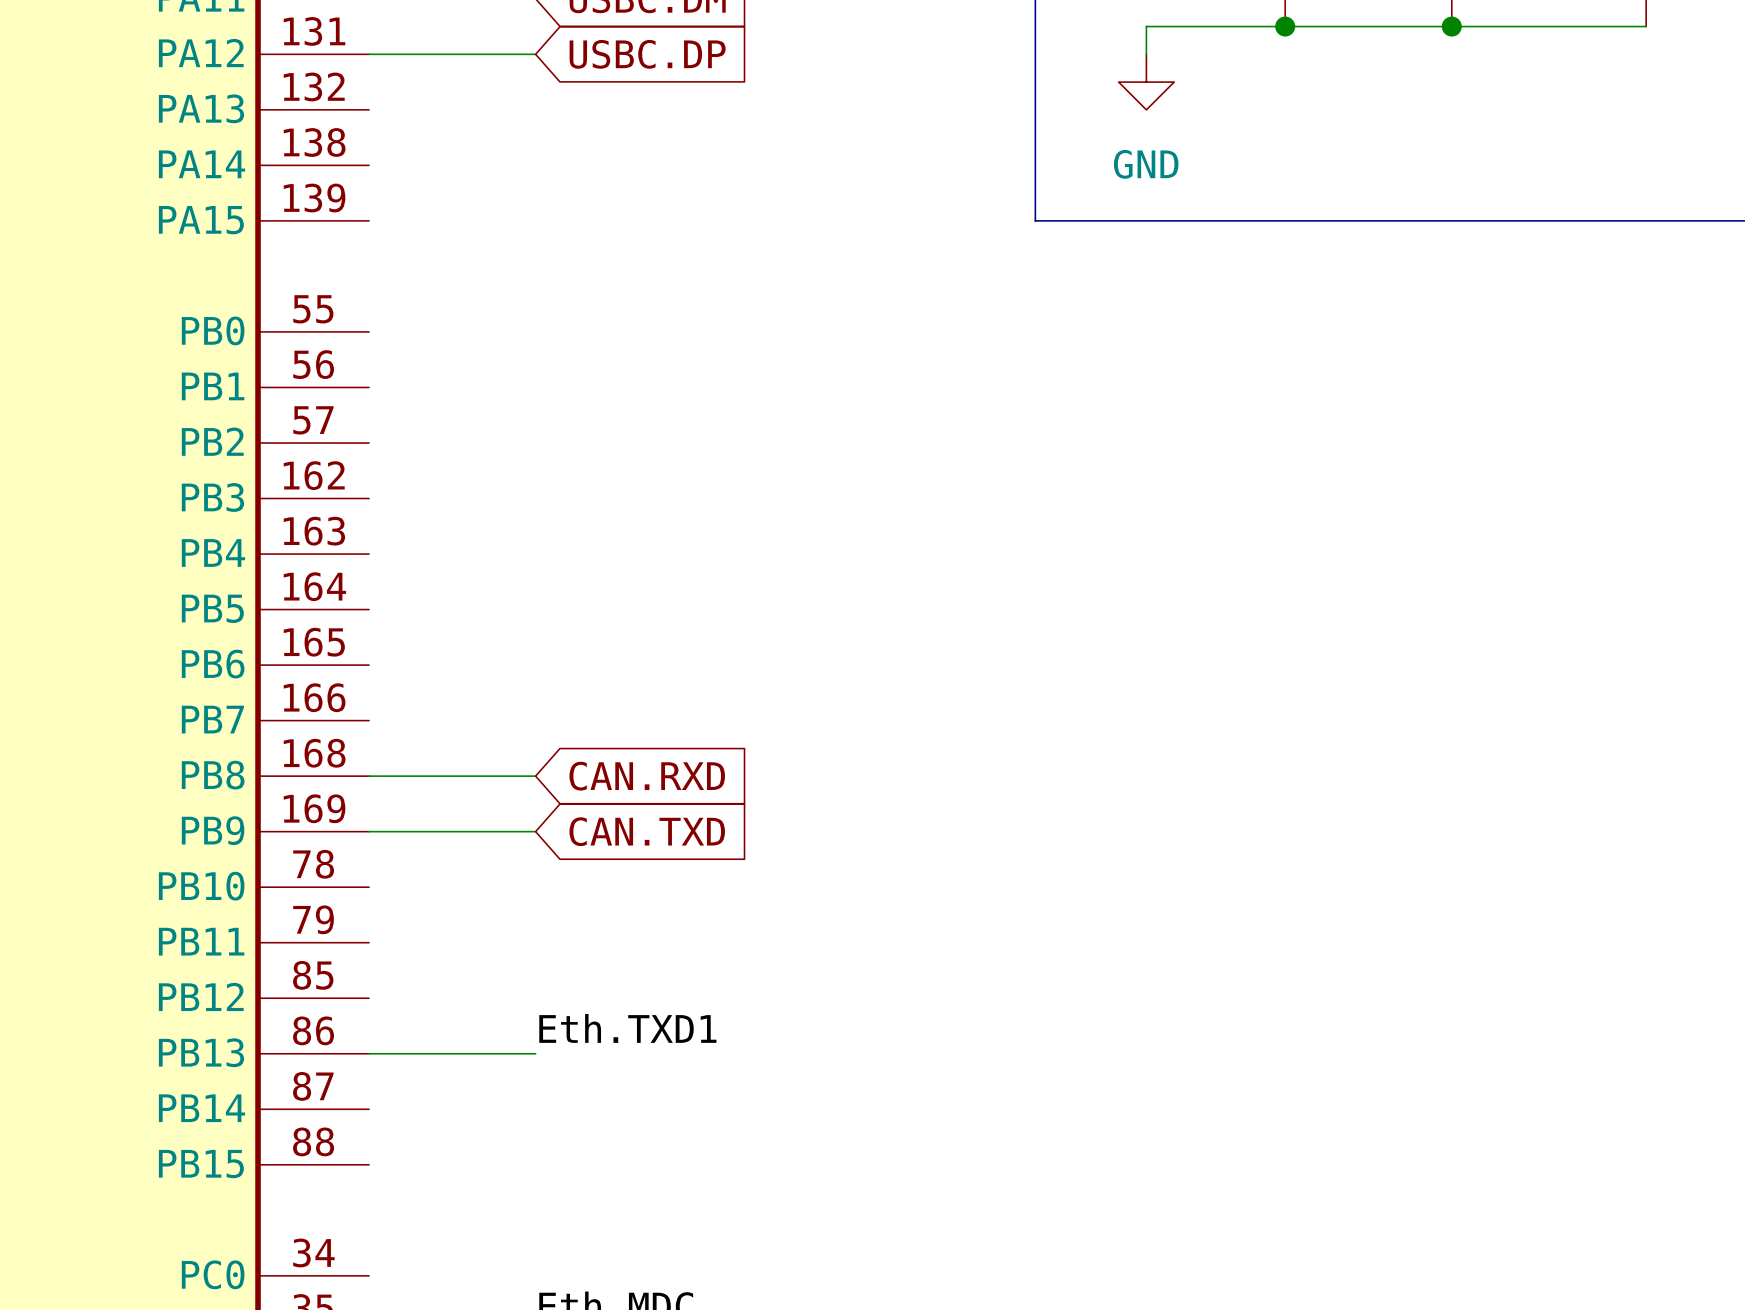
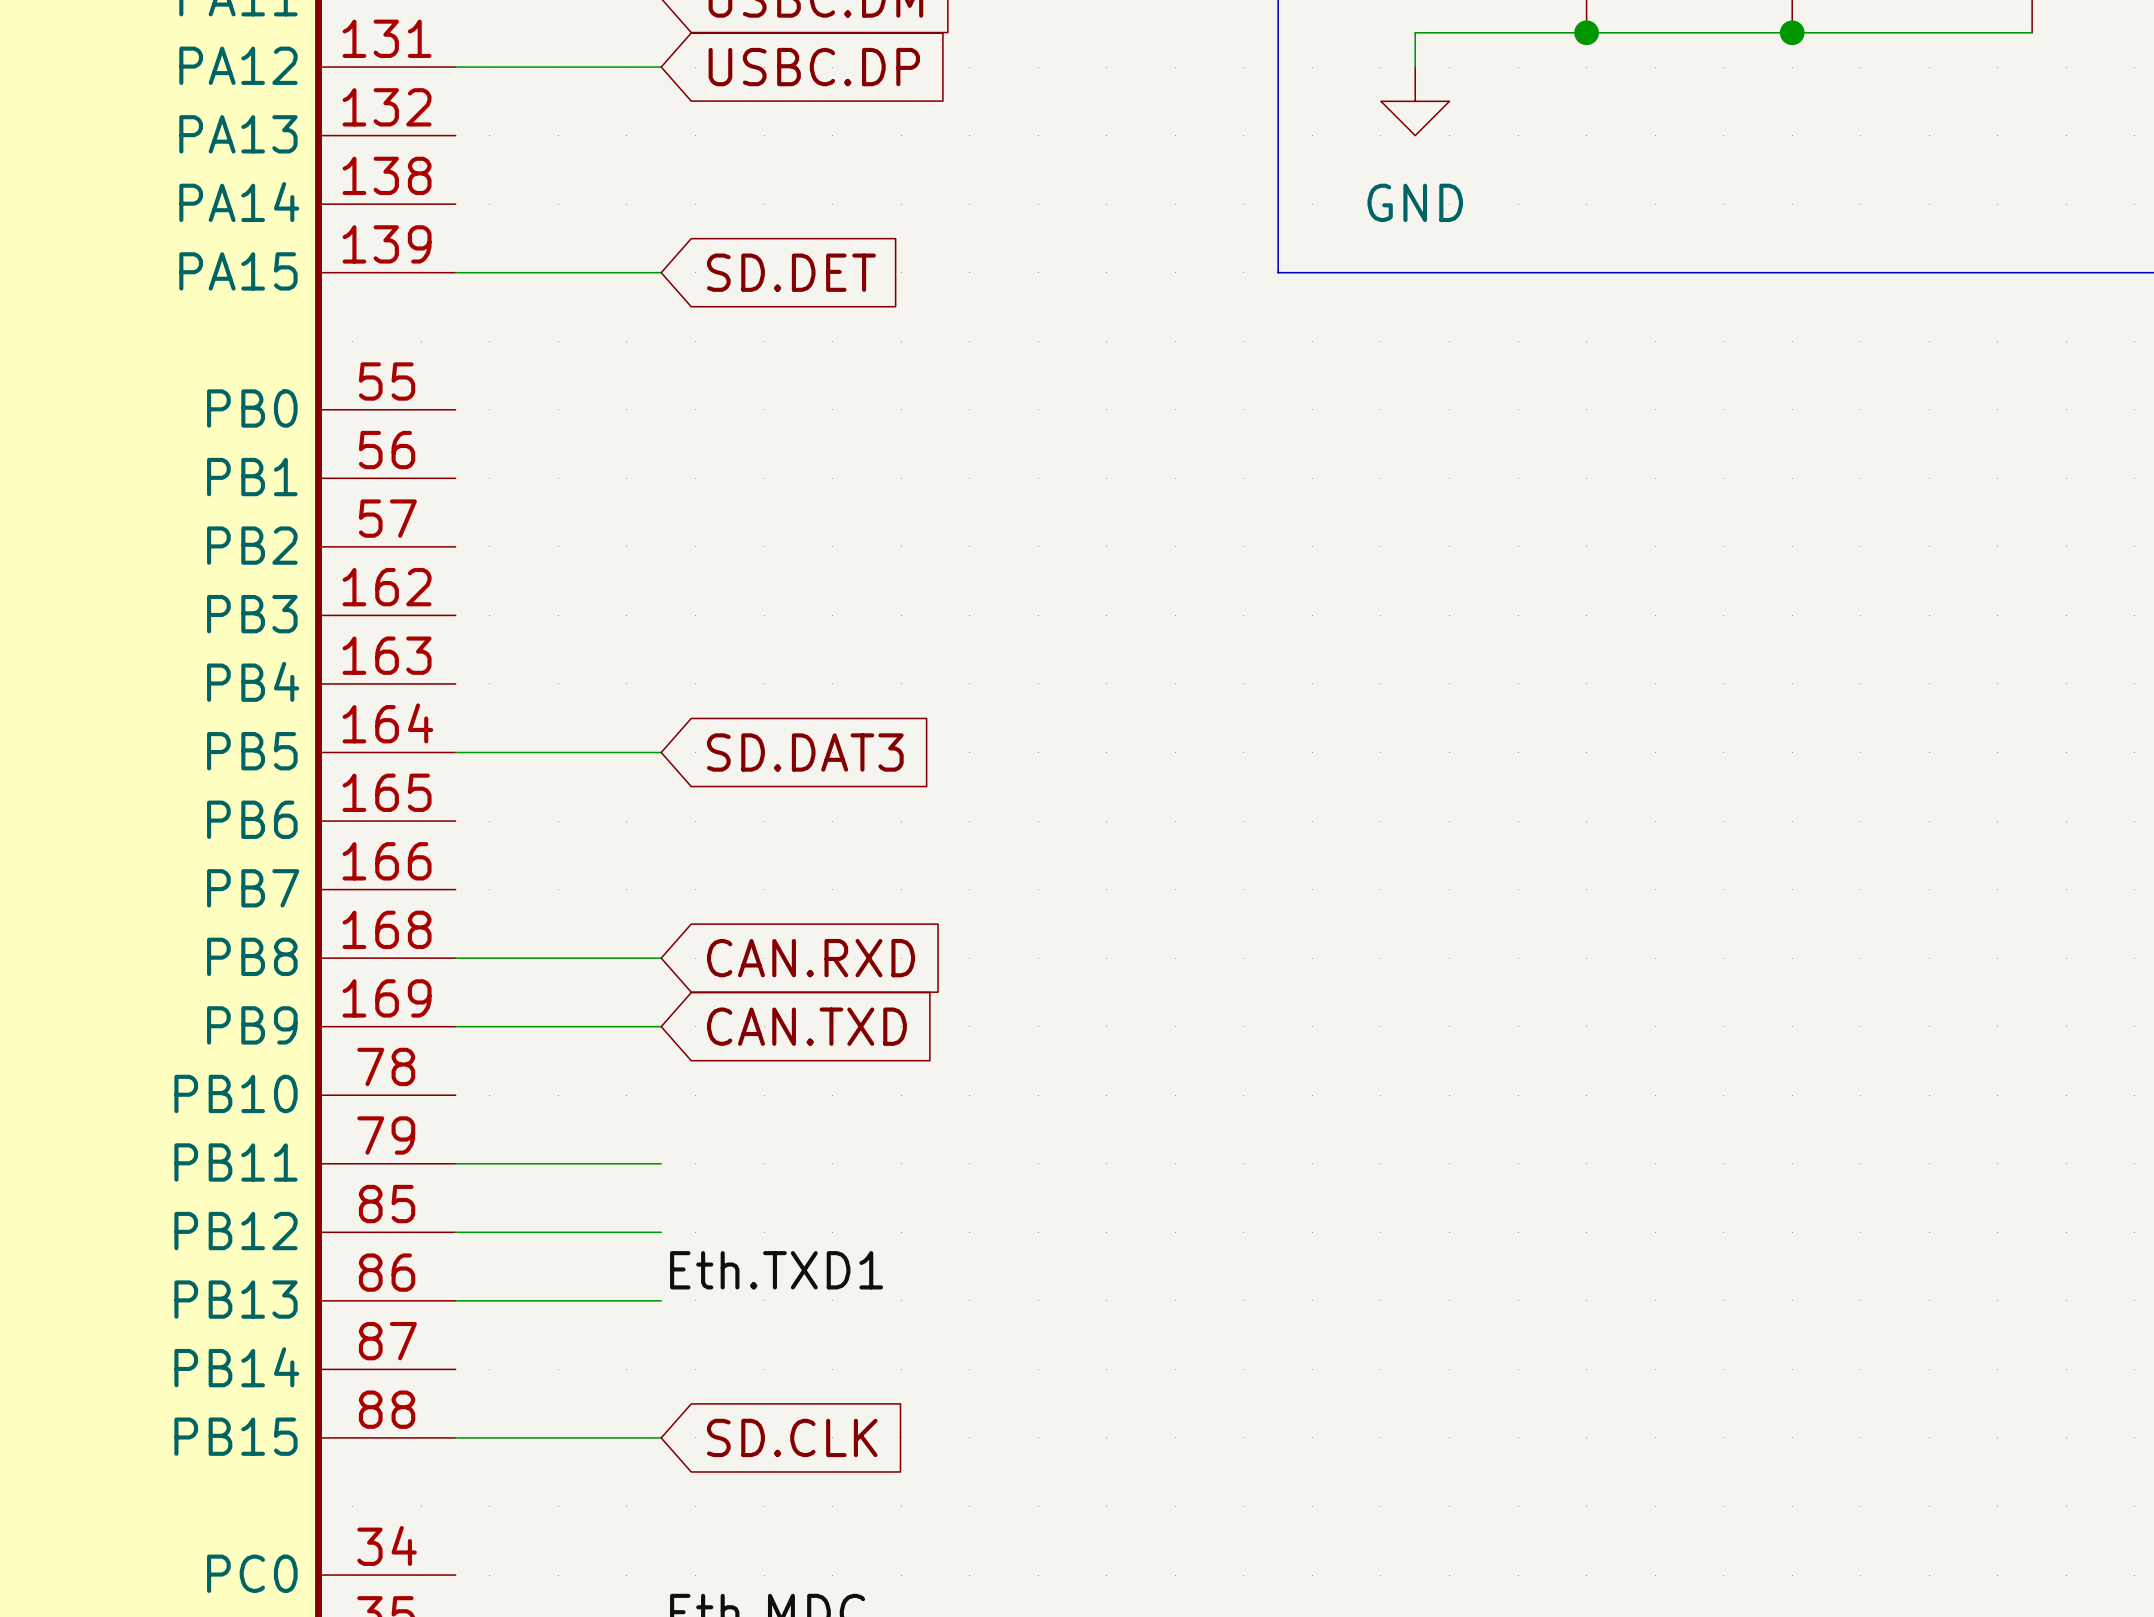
wire: none -> (455, 272) (661, 272)
global label: none -> SD.DET (791, 272)
wire: none -> (455, 752) (661, 752)
global label: none -> SD.DAT3 (805, 752)
wire: none -> (455, 1163) (661, 1163)
wire: none -> (455, 1232) (661, 1232)
wire: none -> (455, 1437) (661, 1437)
global label: none -> SD.CLK (792, 1437)

